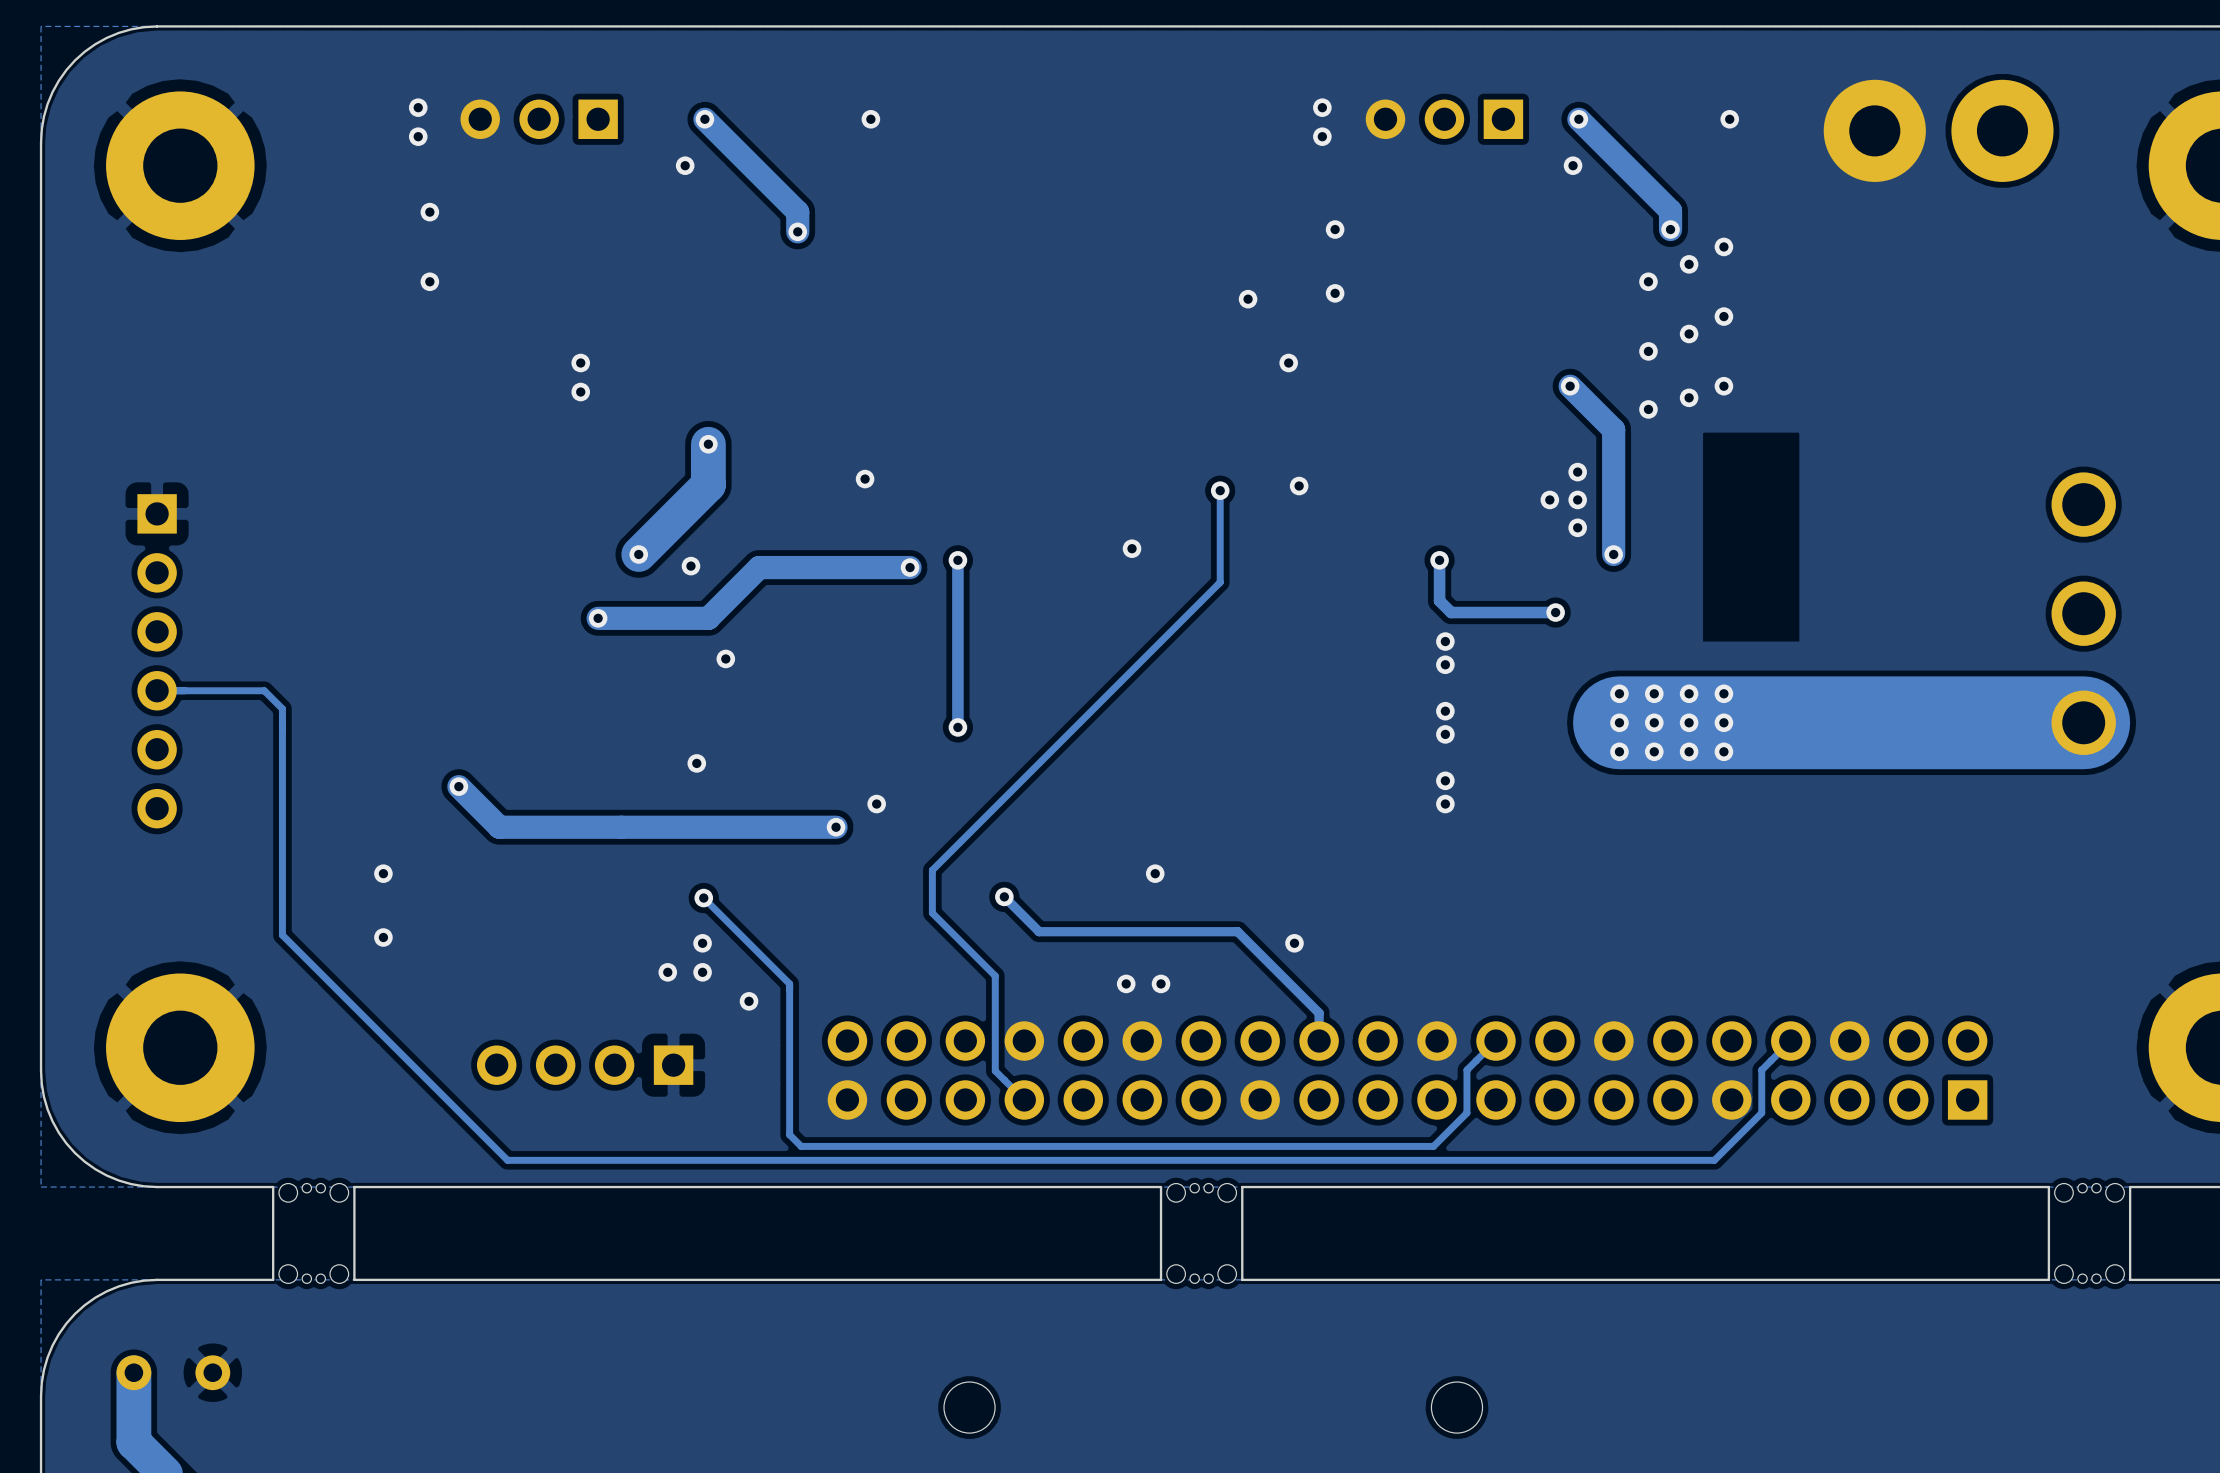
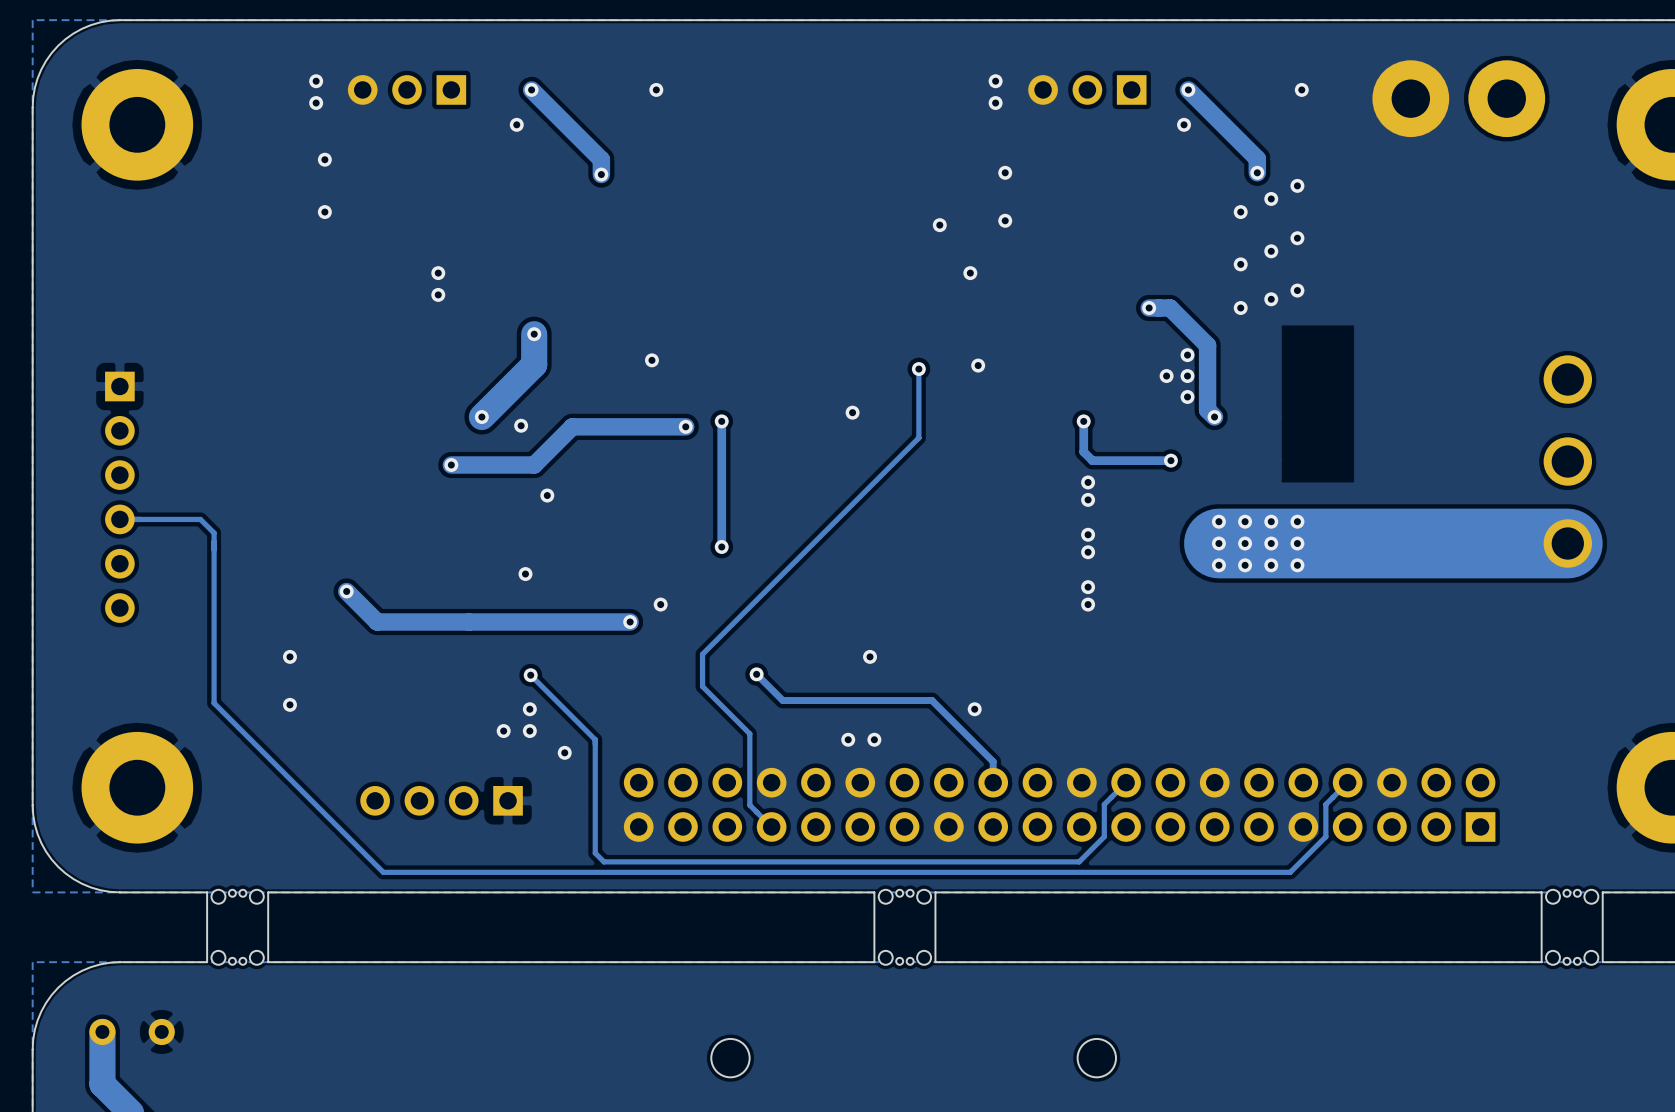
track: (1570, 386) (1613, 429) (1613, 554) -> (1149, 308) (1170, 308) (1207, 345) (1207, 410) (1214, 417)
via position: (1570, 386) -> (1149, 308)

